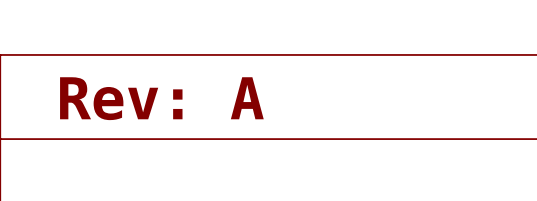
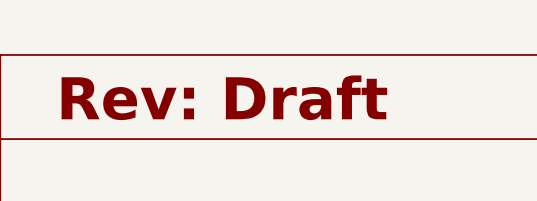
title block: Rev: A (161, 98) -> Rev: Draft (224, 97)

